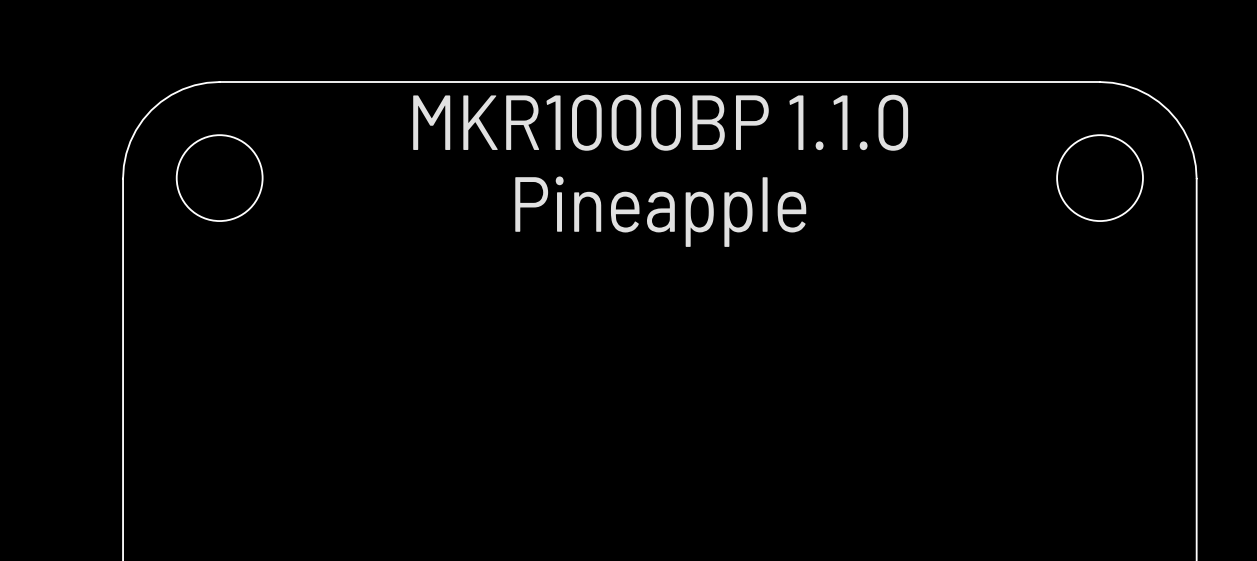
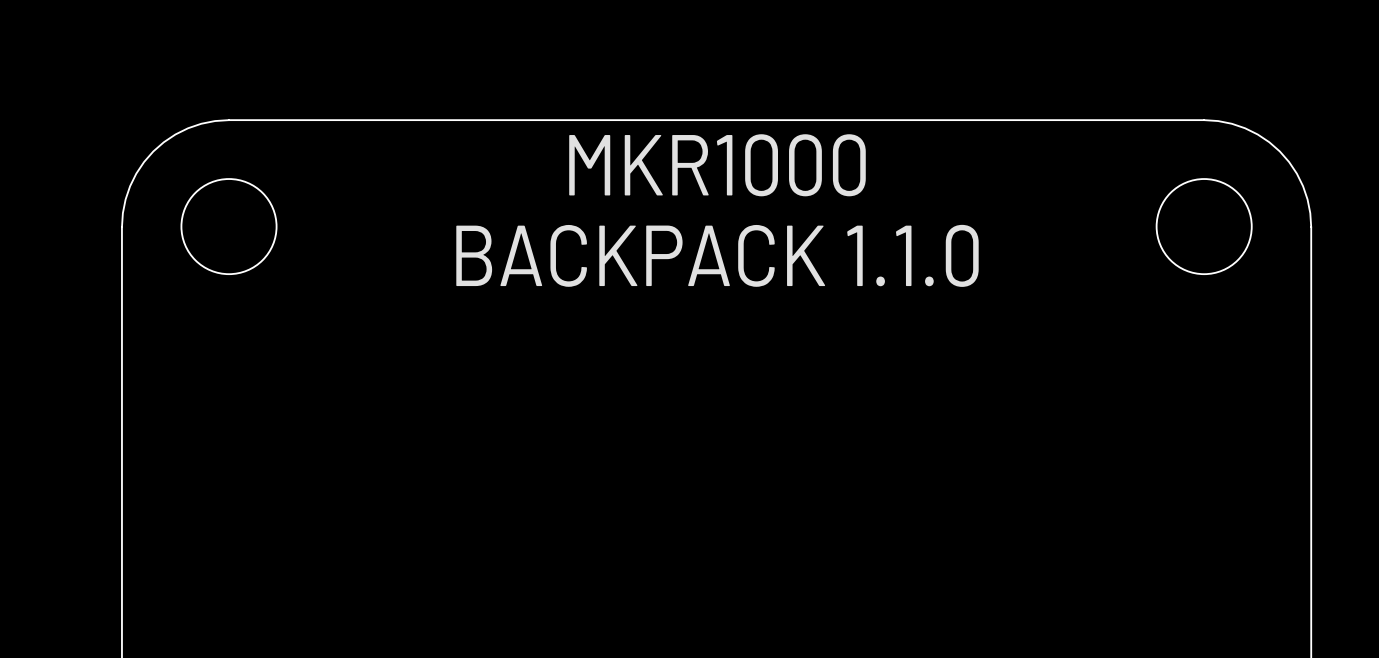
text: MKR1000BP 1.1.0 (660, 122) -> MKR1000 (717, 165)
text: Pineapple (660, 211) -> BACKPACK 1.1.0 (717, 255)

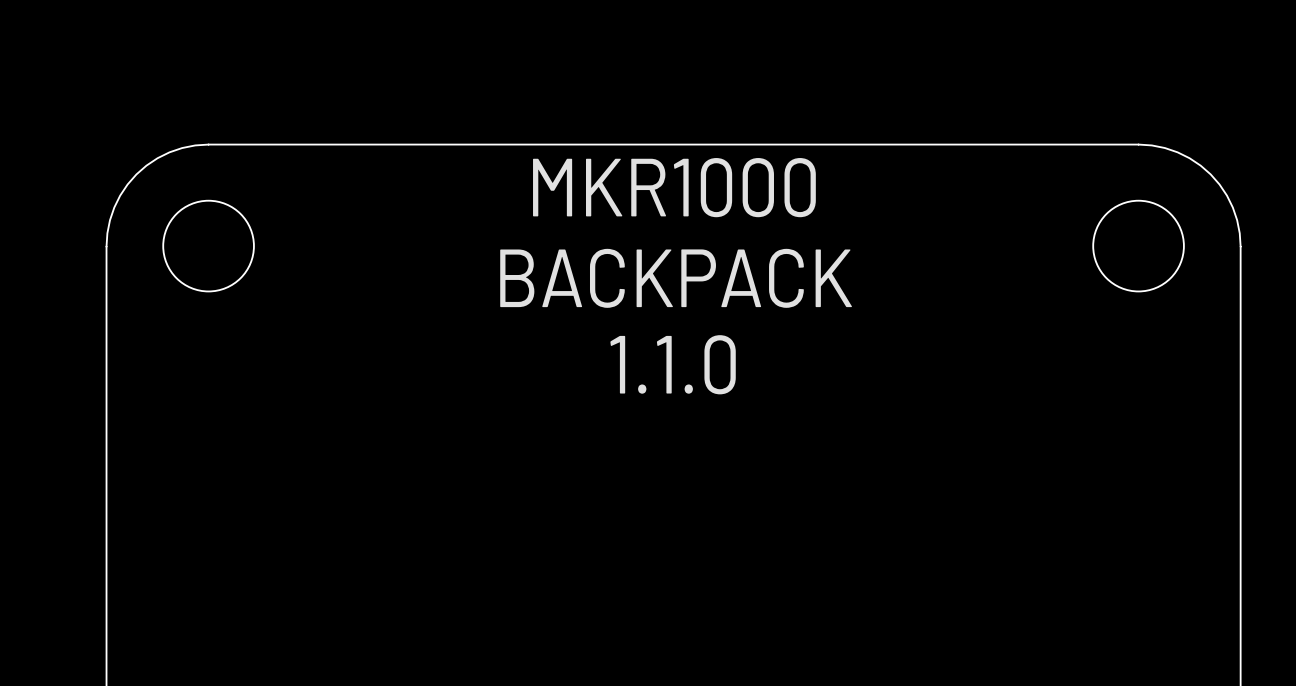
text: BACKPACK 1.1.0 (717, 255) -> BACKPACK (676, 278)
text: none -> 1.1.0 (673, 364)

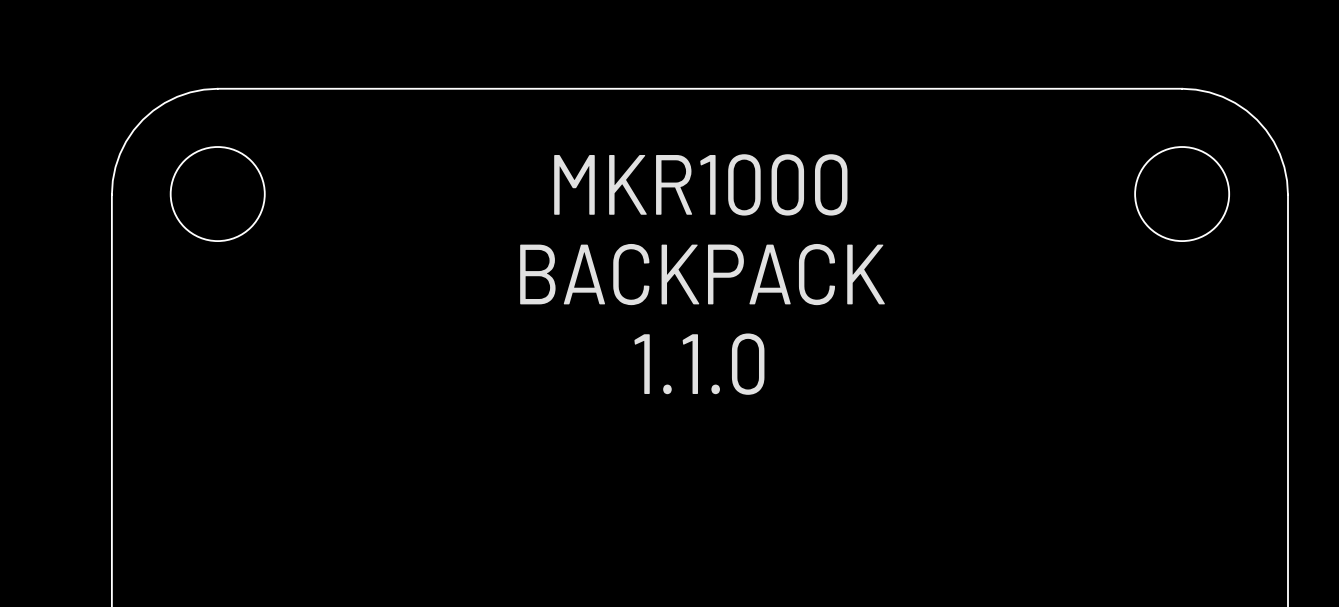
text position: MKR1000 (674, 187) -> MKR1000 (700, 184)
text position: BACKPACK (676, 278) -> BACKPACK (702, 274)
text position: 1.1.0 (673, 364) -> 1.1.0 (699, 364)

